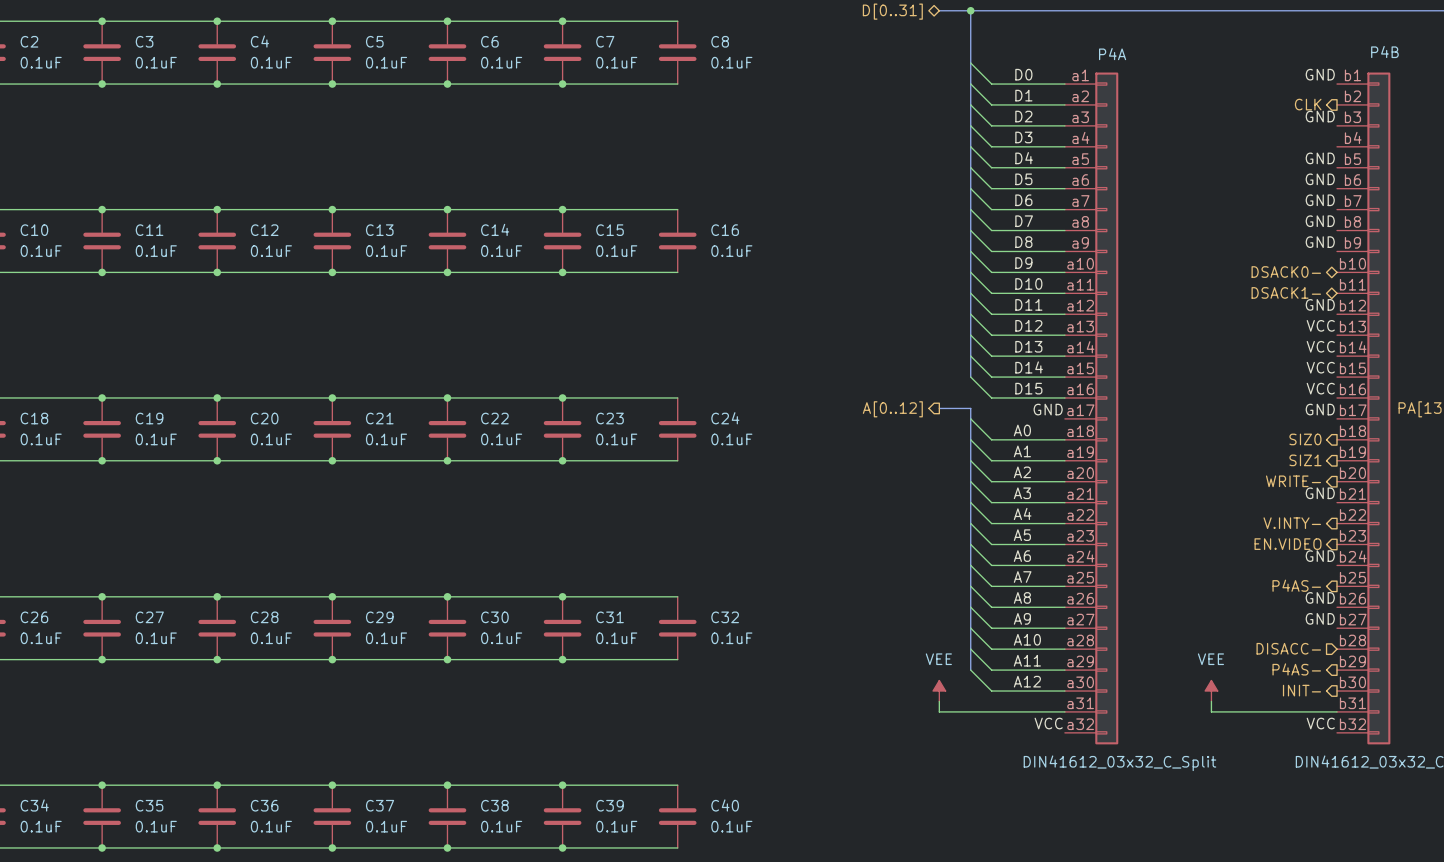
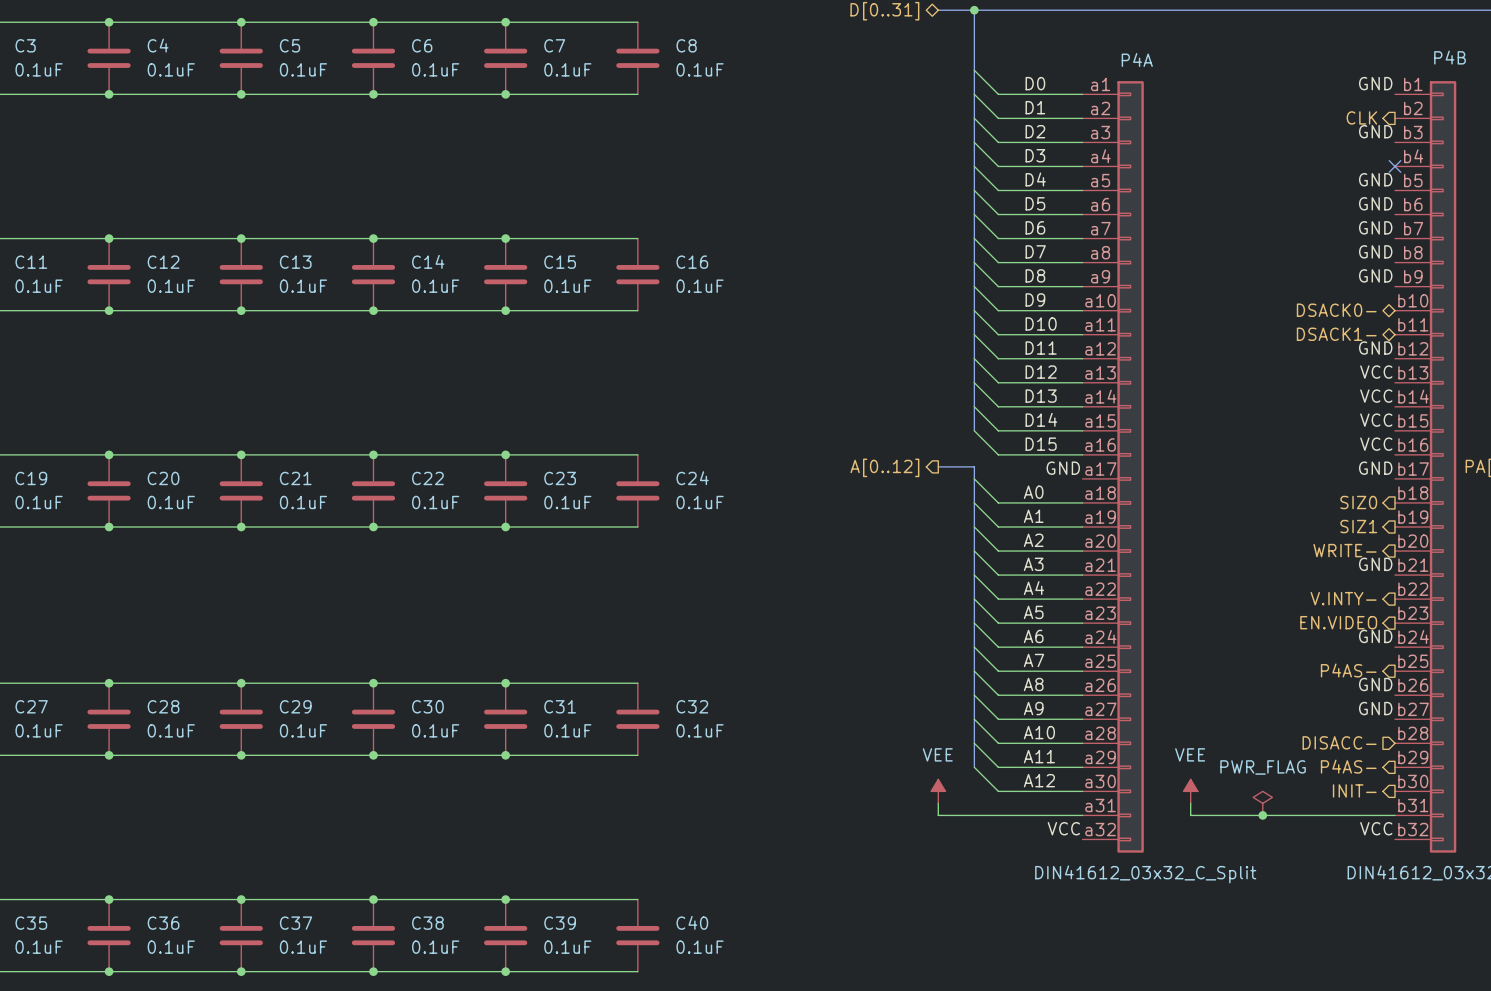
no-connect mark: none -> (1394, 166)
power symbol position: VEE (1211, 691) -> VEE (1190, 791)
wire: (1211, 701) (1211, 711) -> (1190, 803) (1190, 815) (1250, 815)
power symbol: none -> PWR_FLAG (1262, 803)
junction: none -> (1262, 815)

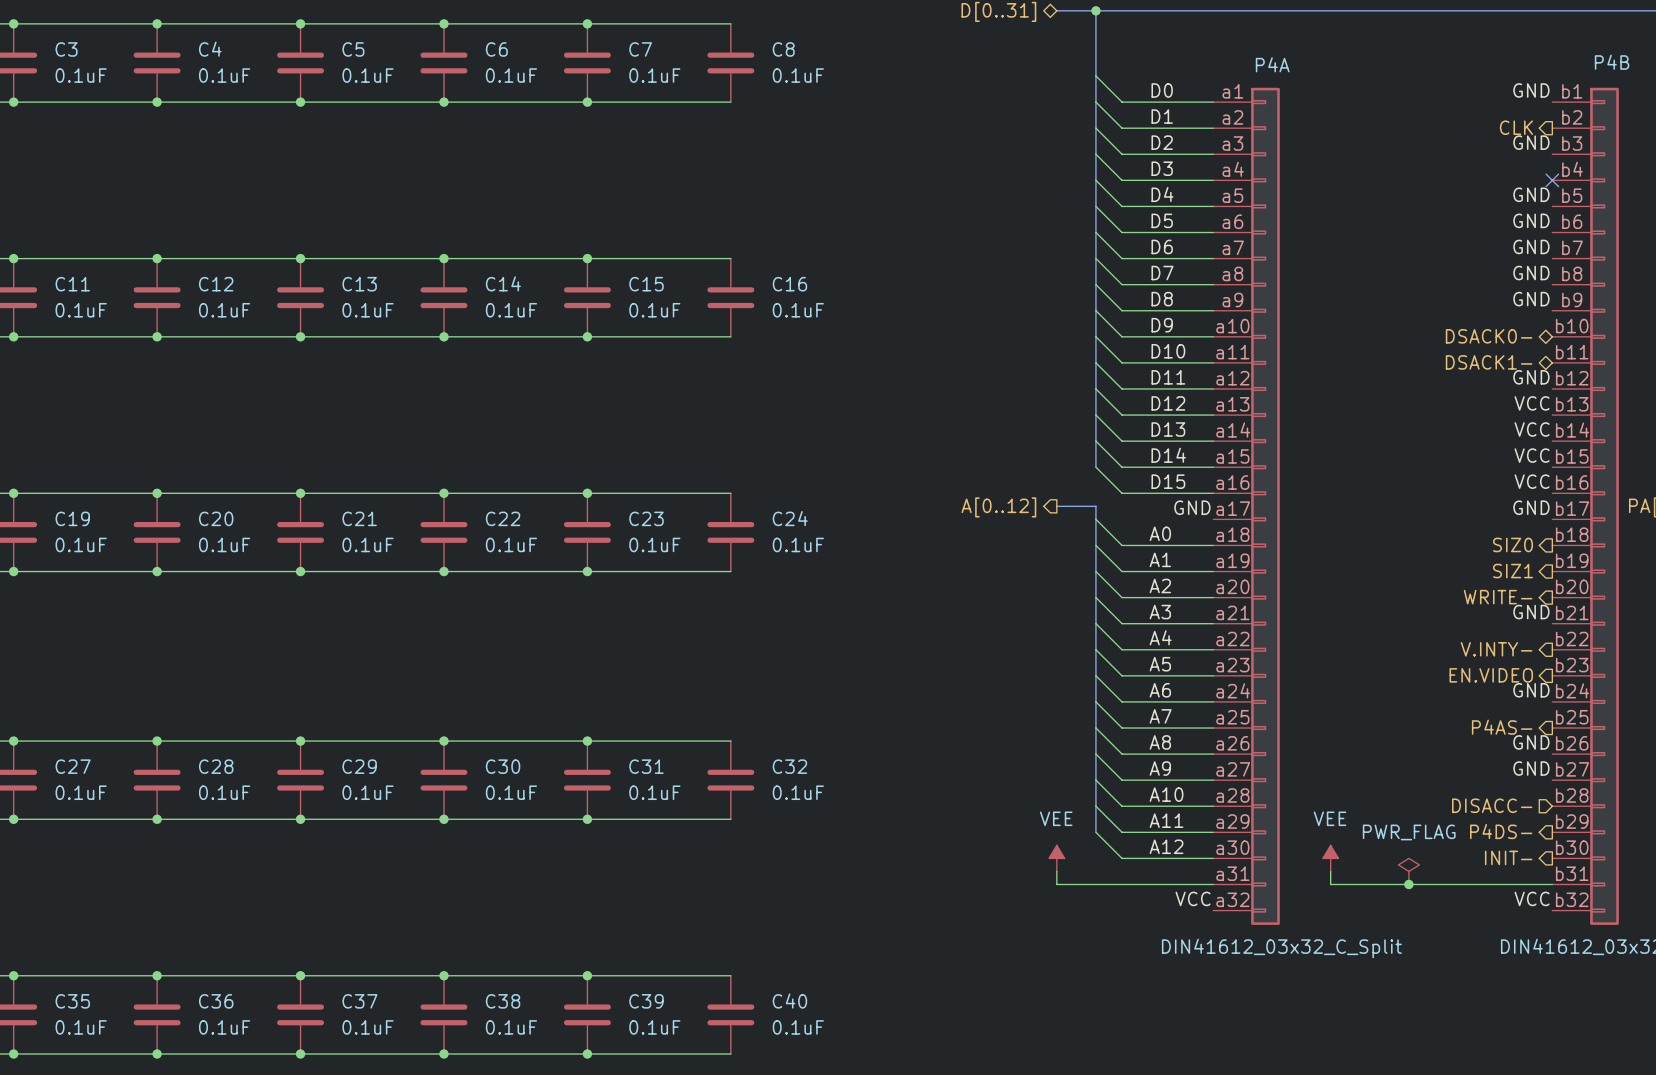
hierarchical label: P4AS- (1348, 766) -> P4DS- (1501, 831)

